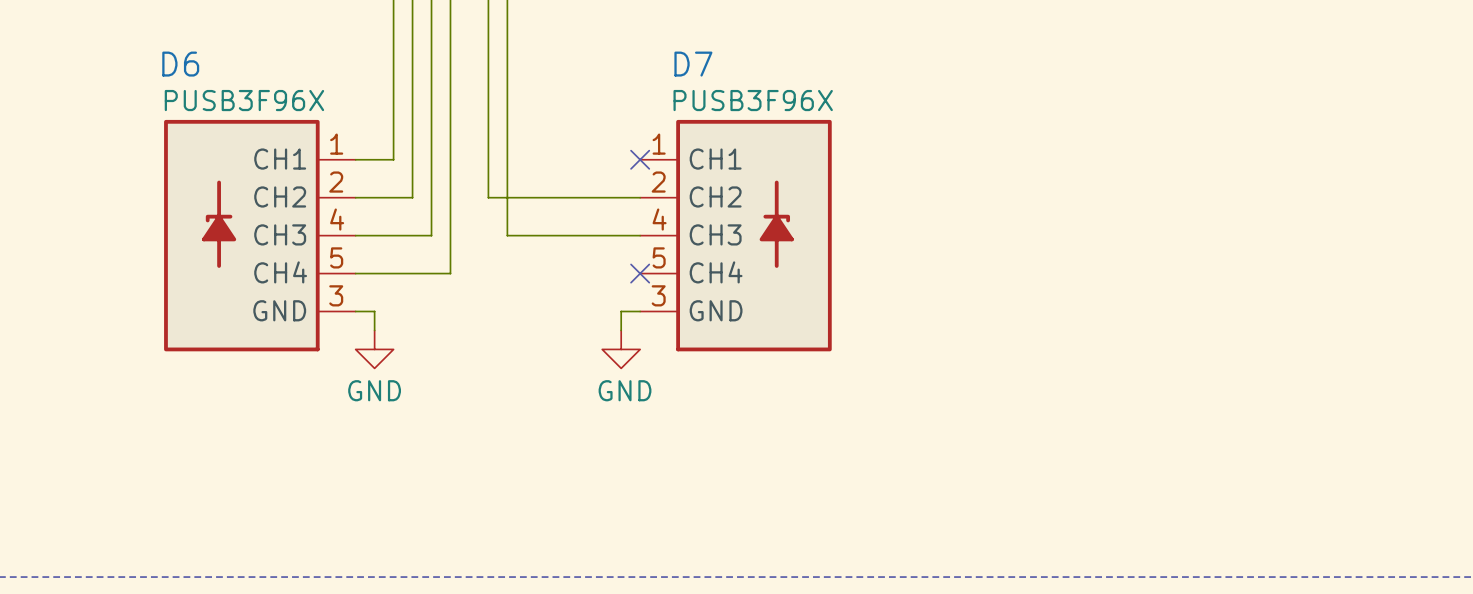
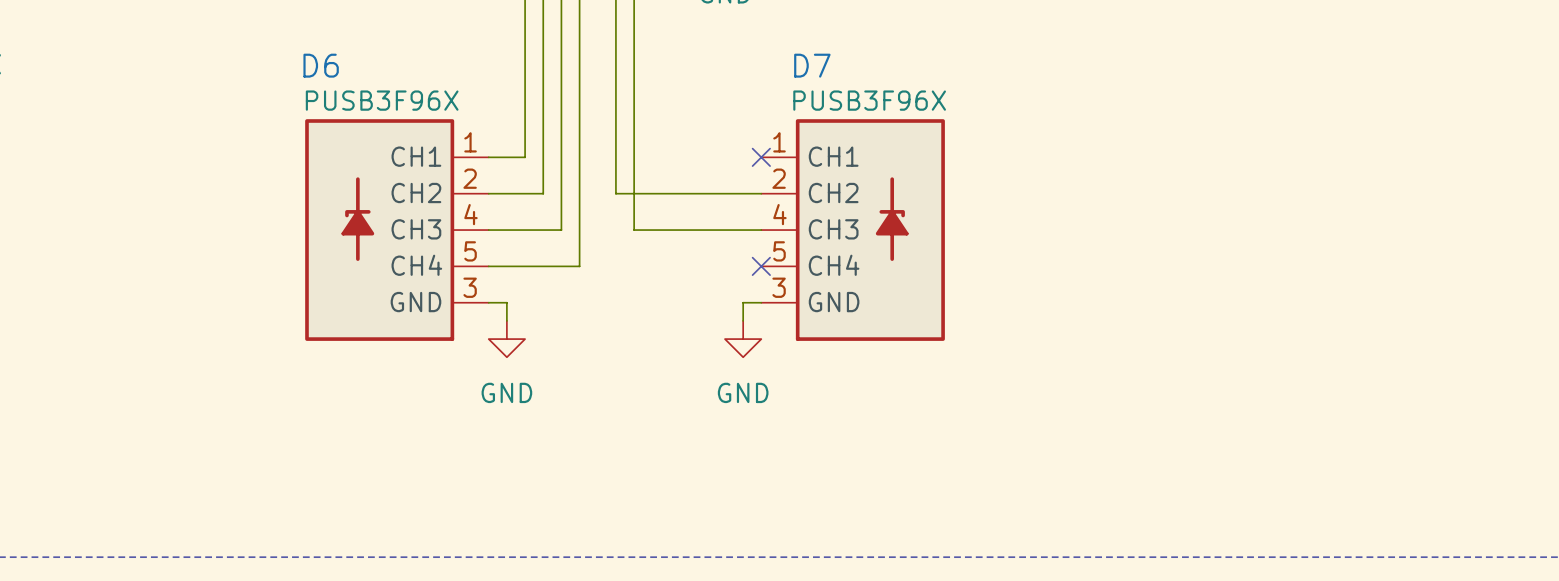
power symbol text position: GND (374, 390) -> GND (506, 392)
power symbol text position: GND (625, 390) -> GND (743, 392)

